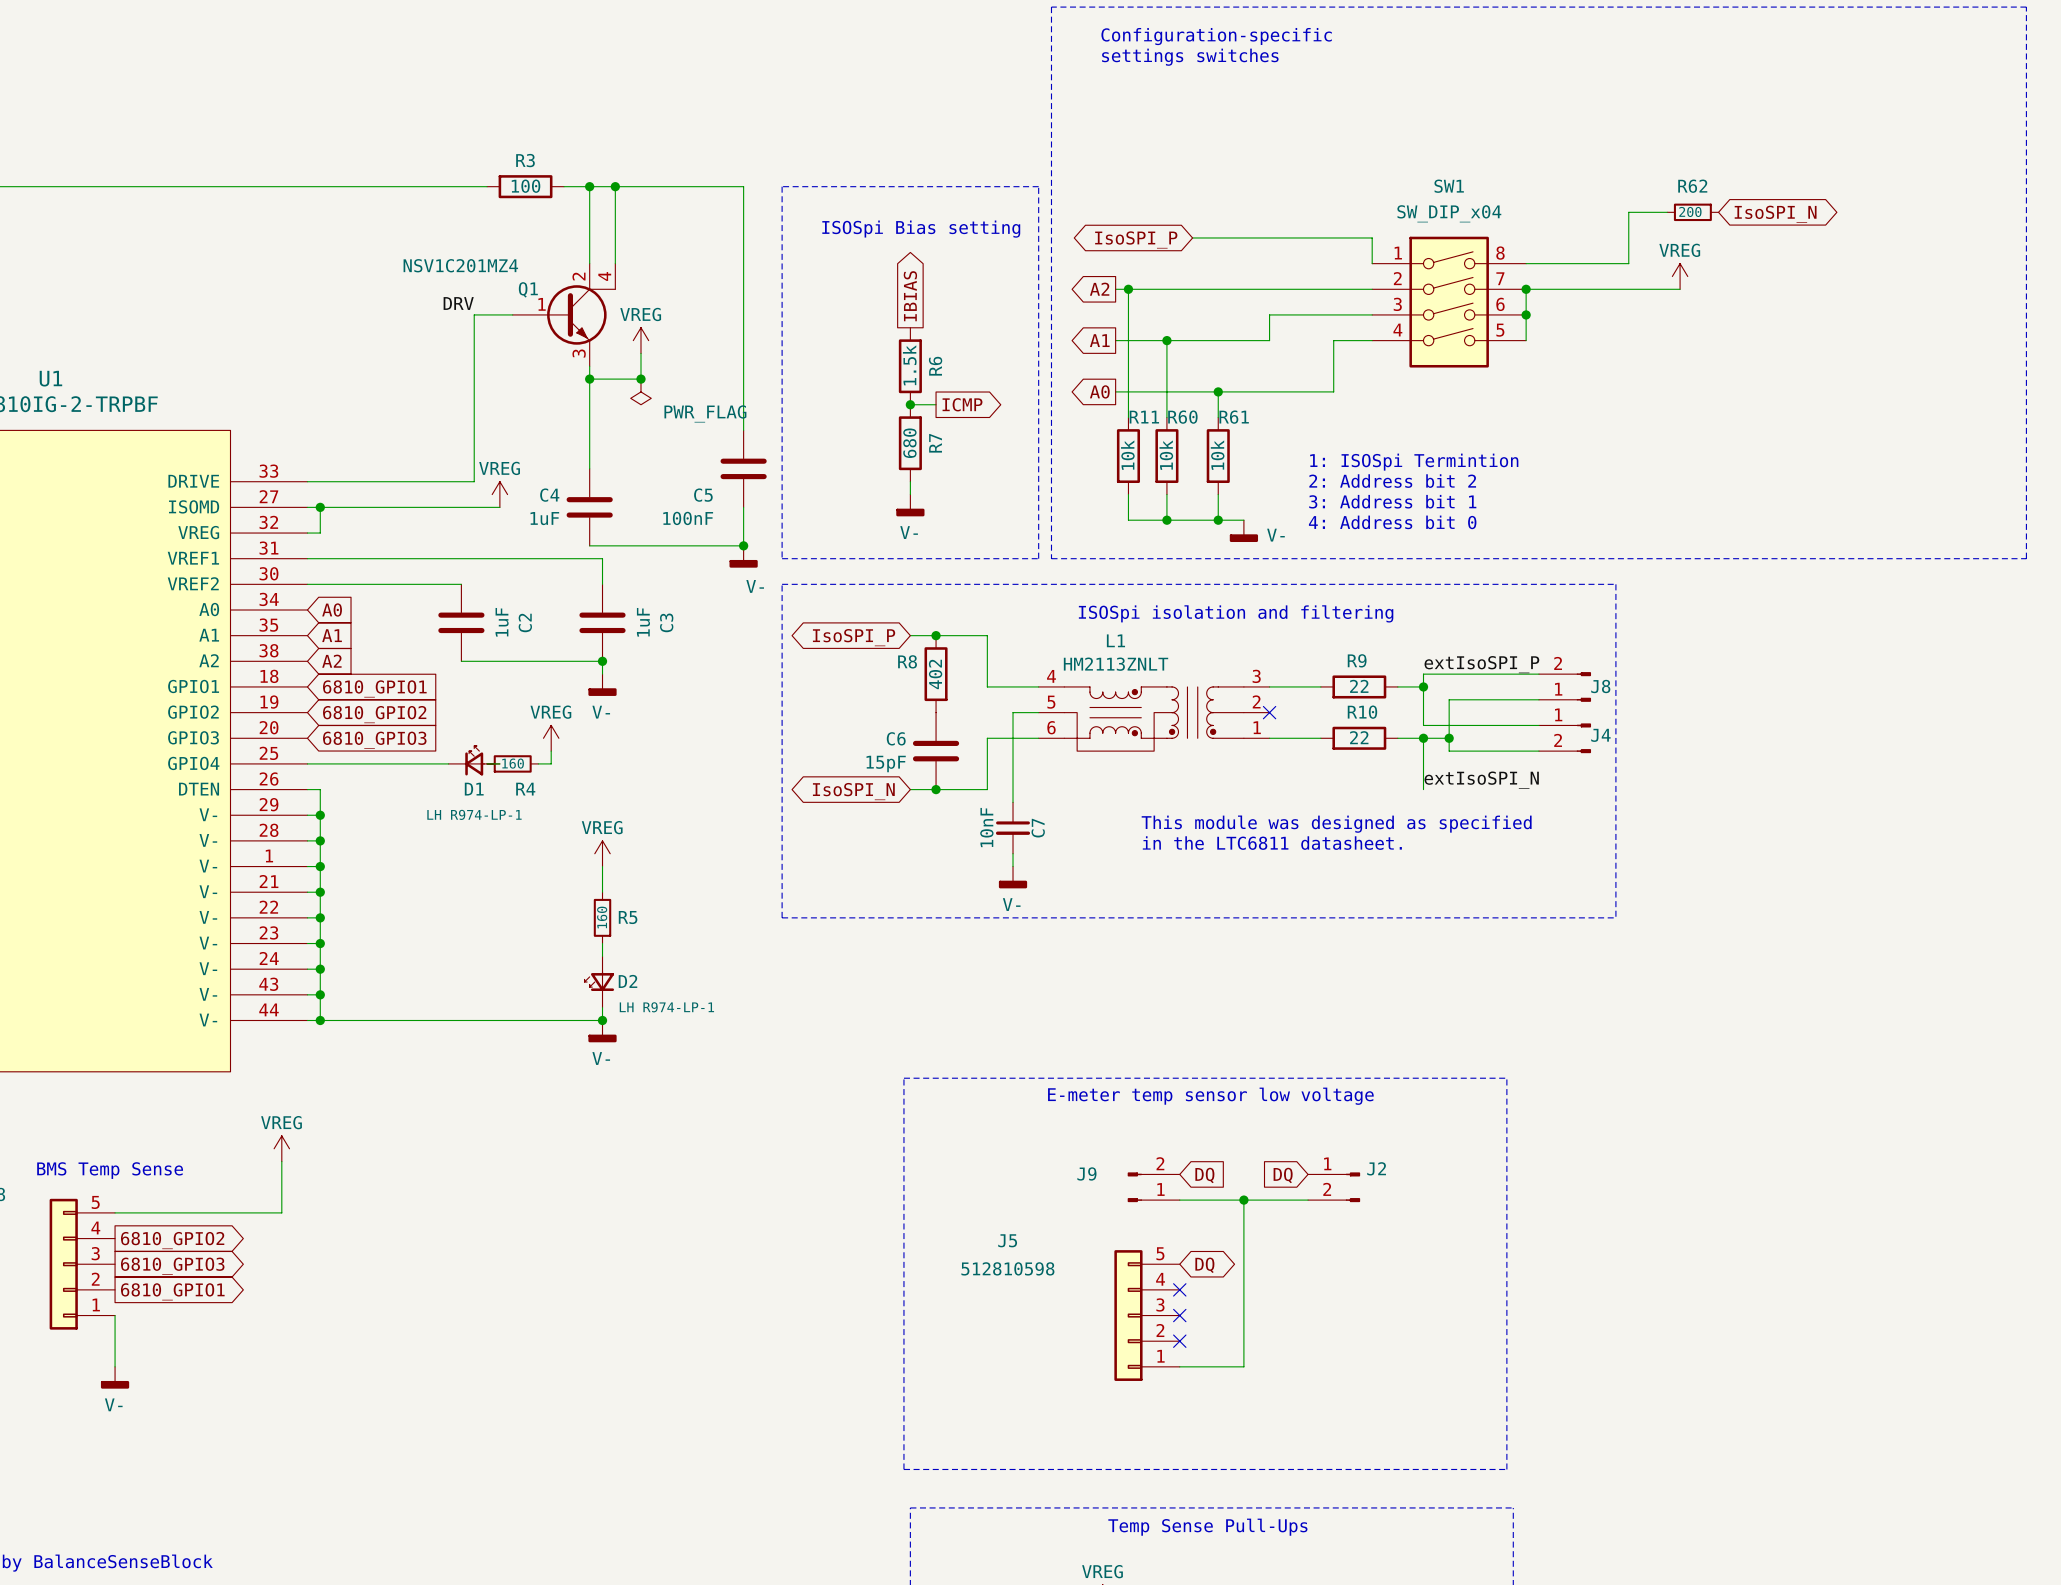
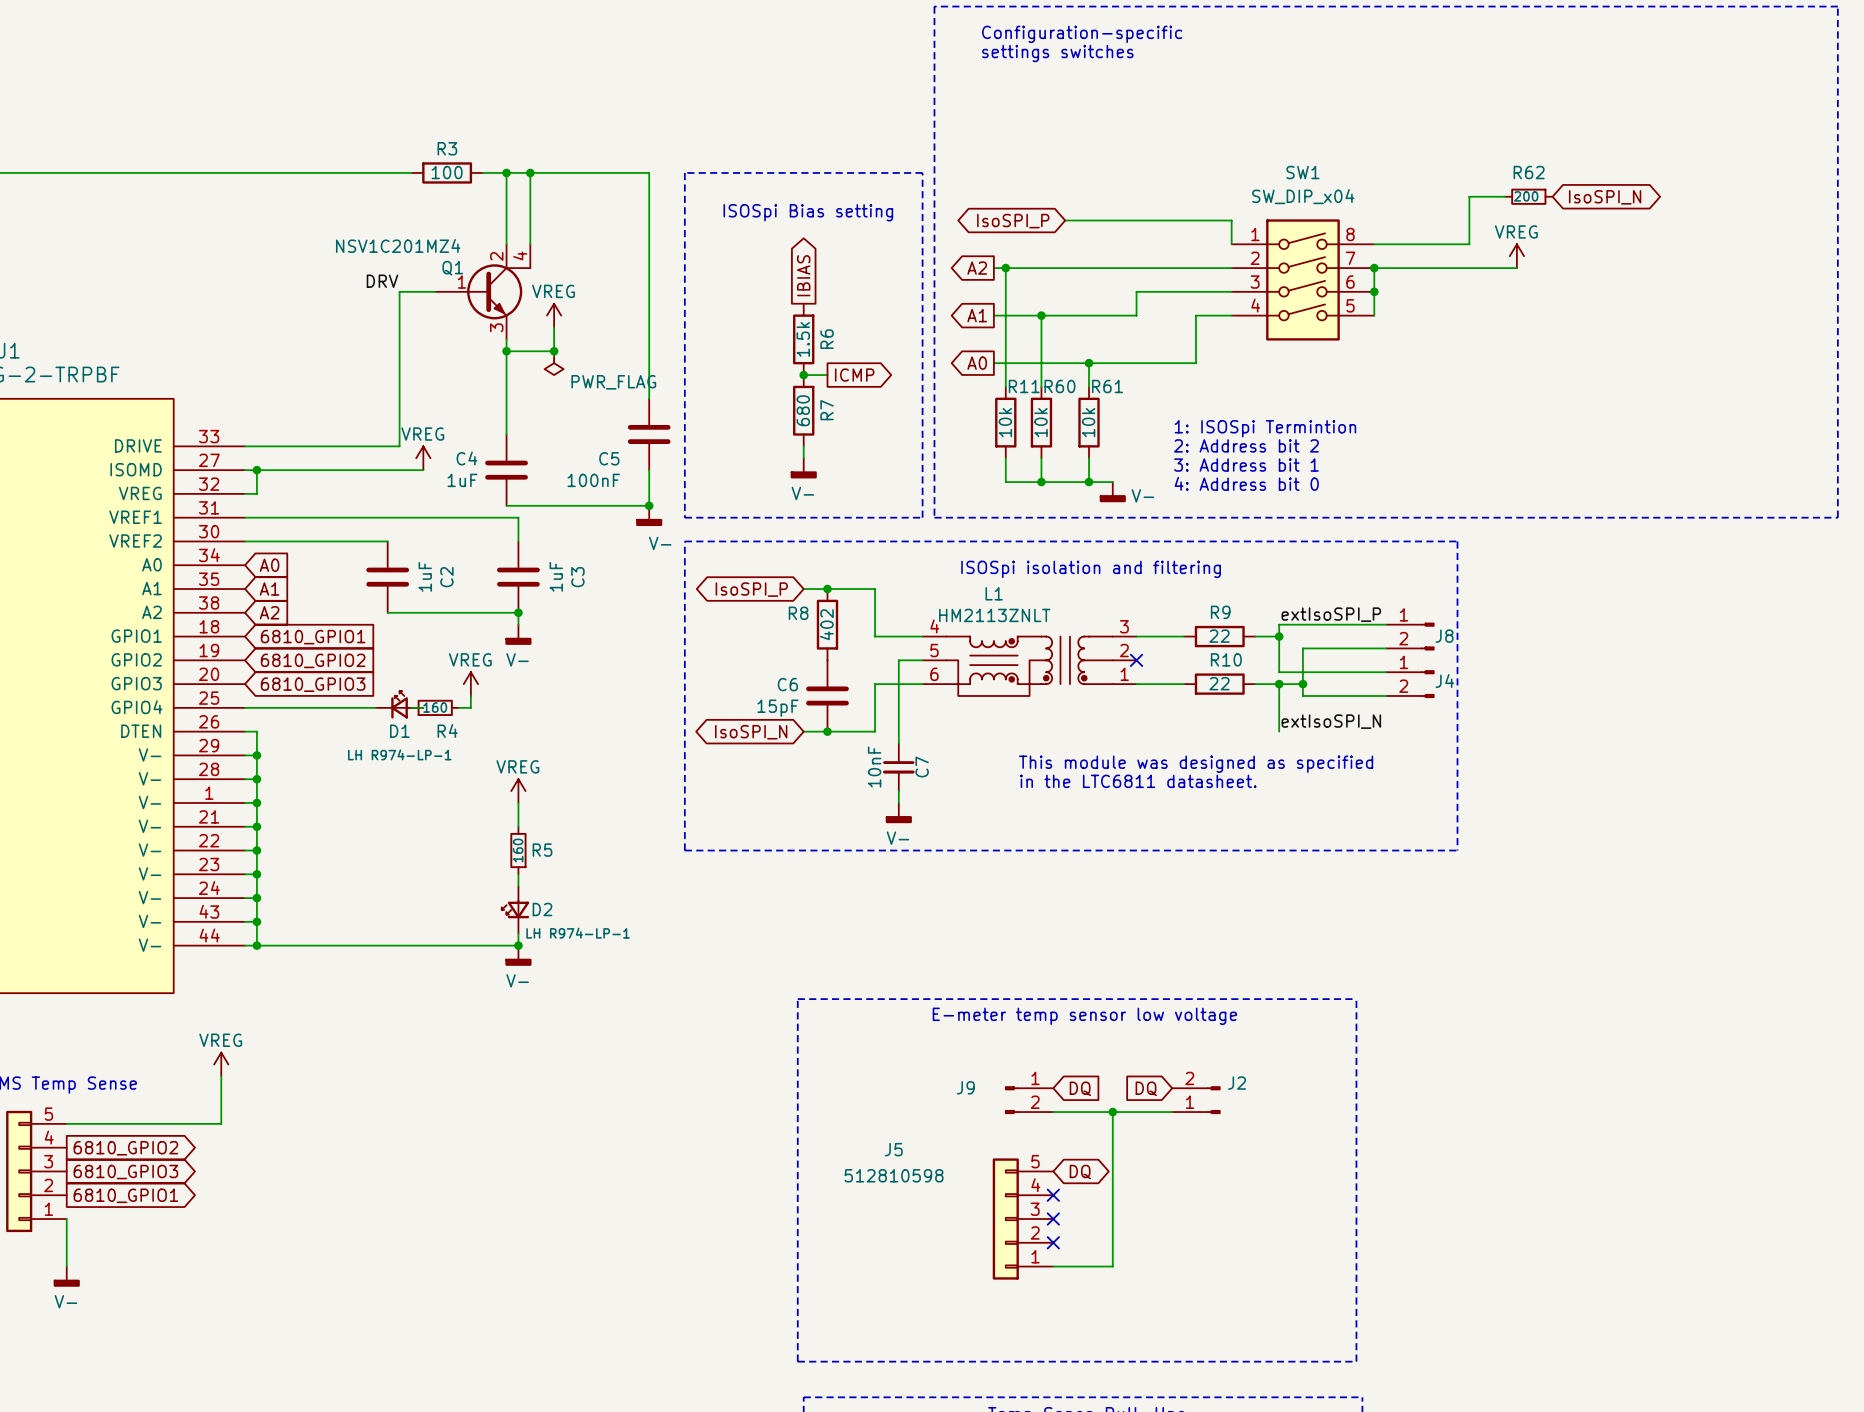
J8 flip: as is (1583, 686) -> up-down (1427, 636)
J9 flip: as is (1134, 1187) -> up-down (1011, 1100)
J2 flip: as is (1352, 1187) -> up-down (1213, 1100)

